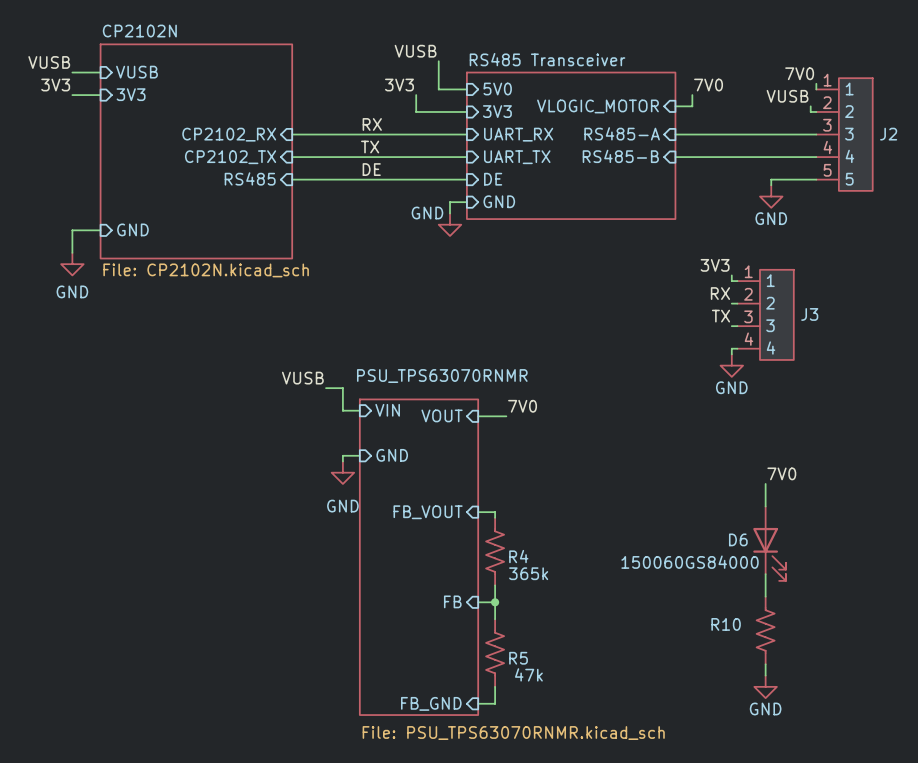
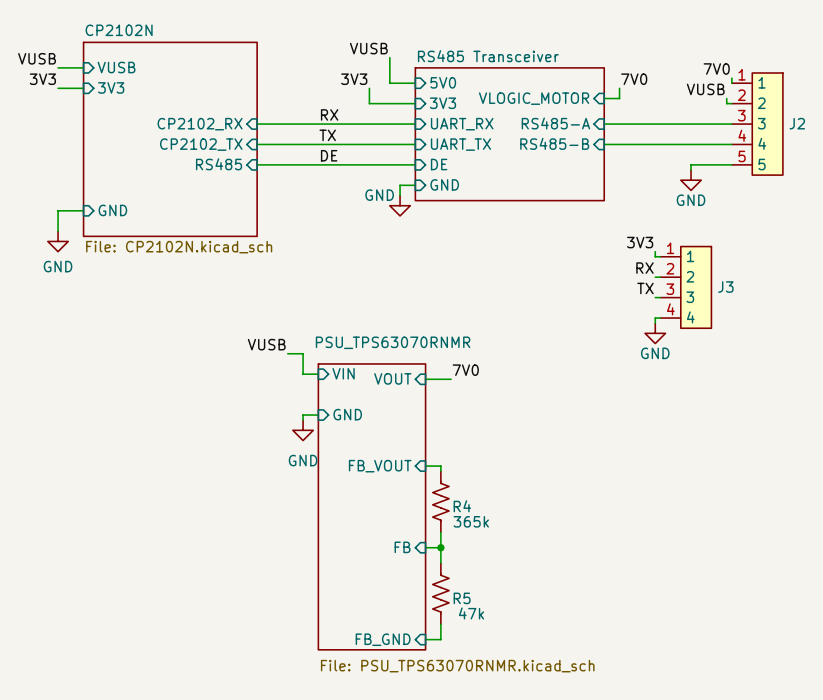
label: 7V0 (781, 473) -> none
wire: (765, 483) (765, 506) -> none
D6: 150060GS84000 (769, 543) -> none
wire: (765, 574) (765, 596) -> none
R10: (765, 630) -> none
wire: (765, 664) (765, 675) -> none
power symbol: GND (765, 686) -> none

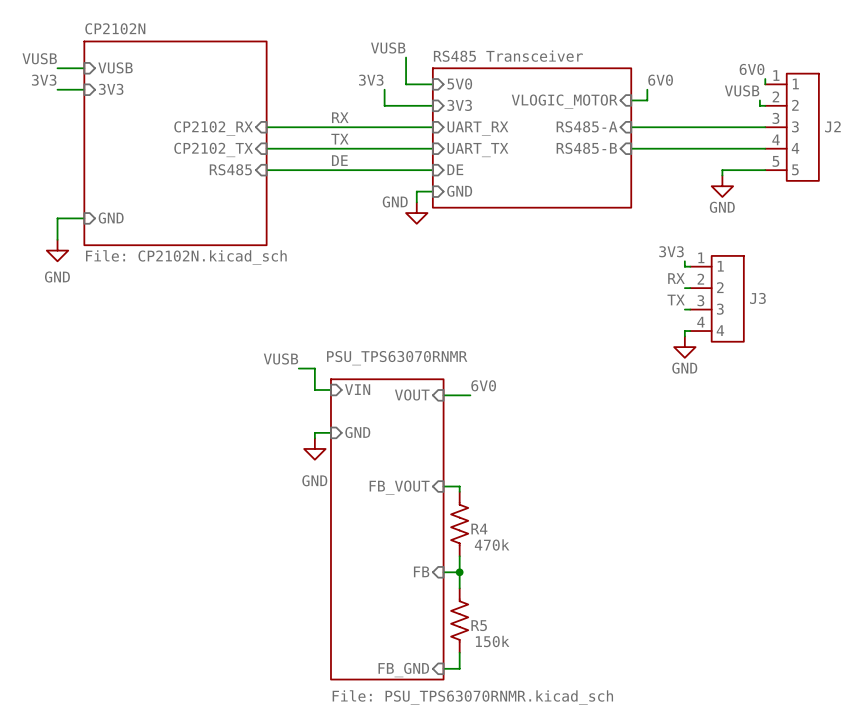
label: 7V0 (716, 69) -> 6V0 (752, 69)
label: 7V0 (634, 79) -> 6V0 (660, 80)
label: 7V0 (465, 370) -> 6V0 (483, 385)
R4 value: 365k (471, 521) -> 470k (492, 544)
R5 value: 47k (471, 613) -> 150k (492, 641)

